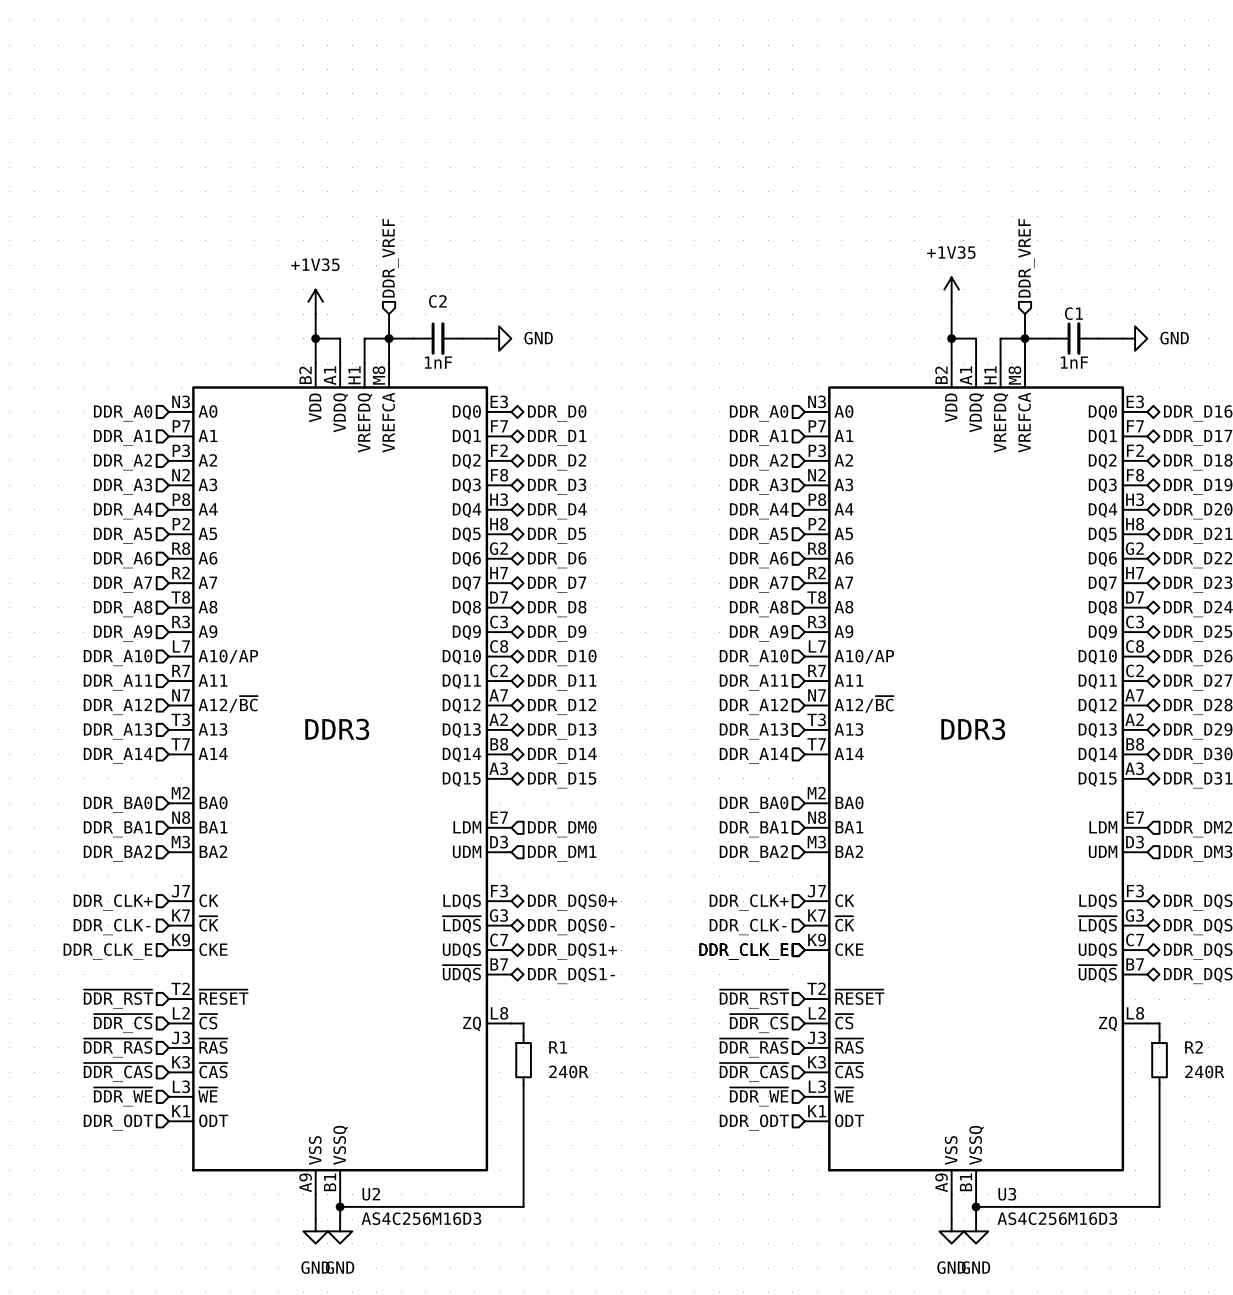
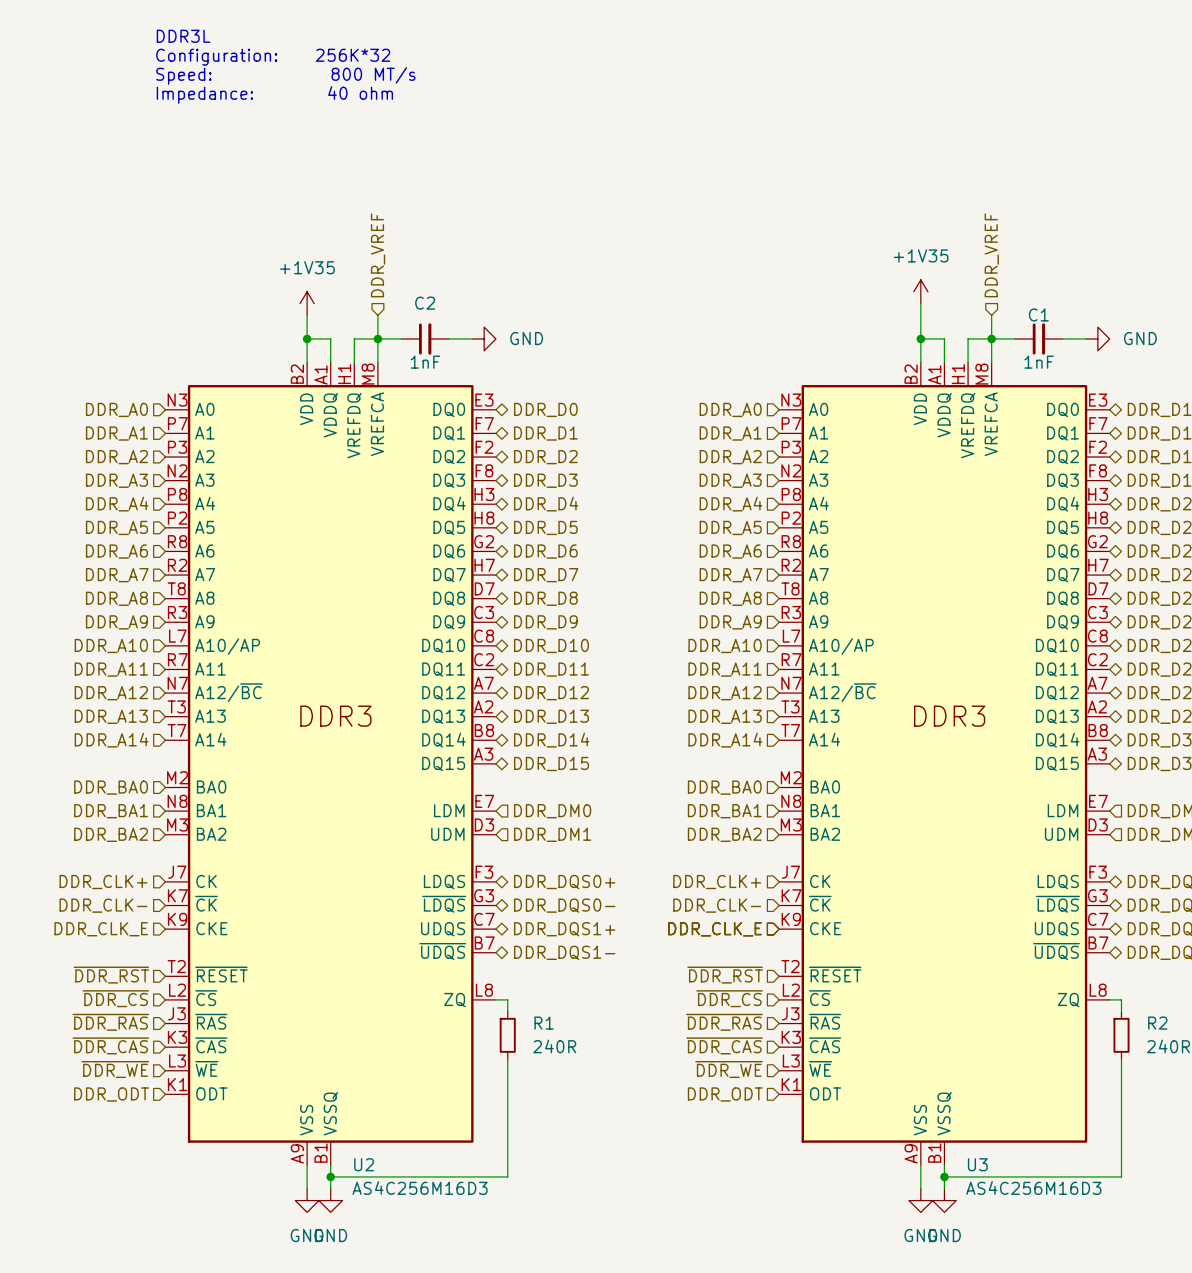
text: none -> DDR3L (183, 36)
text: none -> Configuration: 256K*32 (273, 57)
text: none -> Speed: 800 MT/s (285, 75)
text: none -> Impedance: 40 ohm (274, 94)

